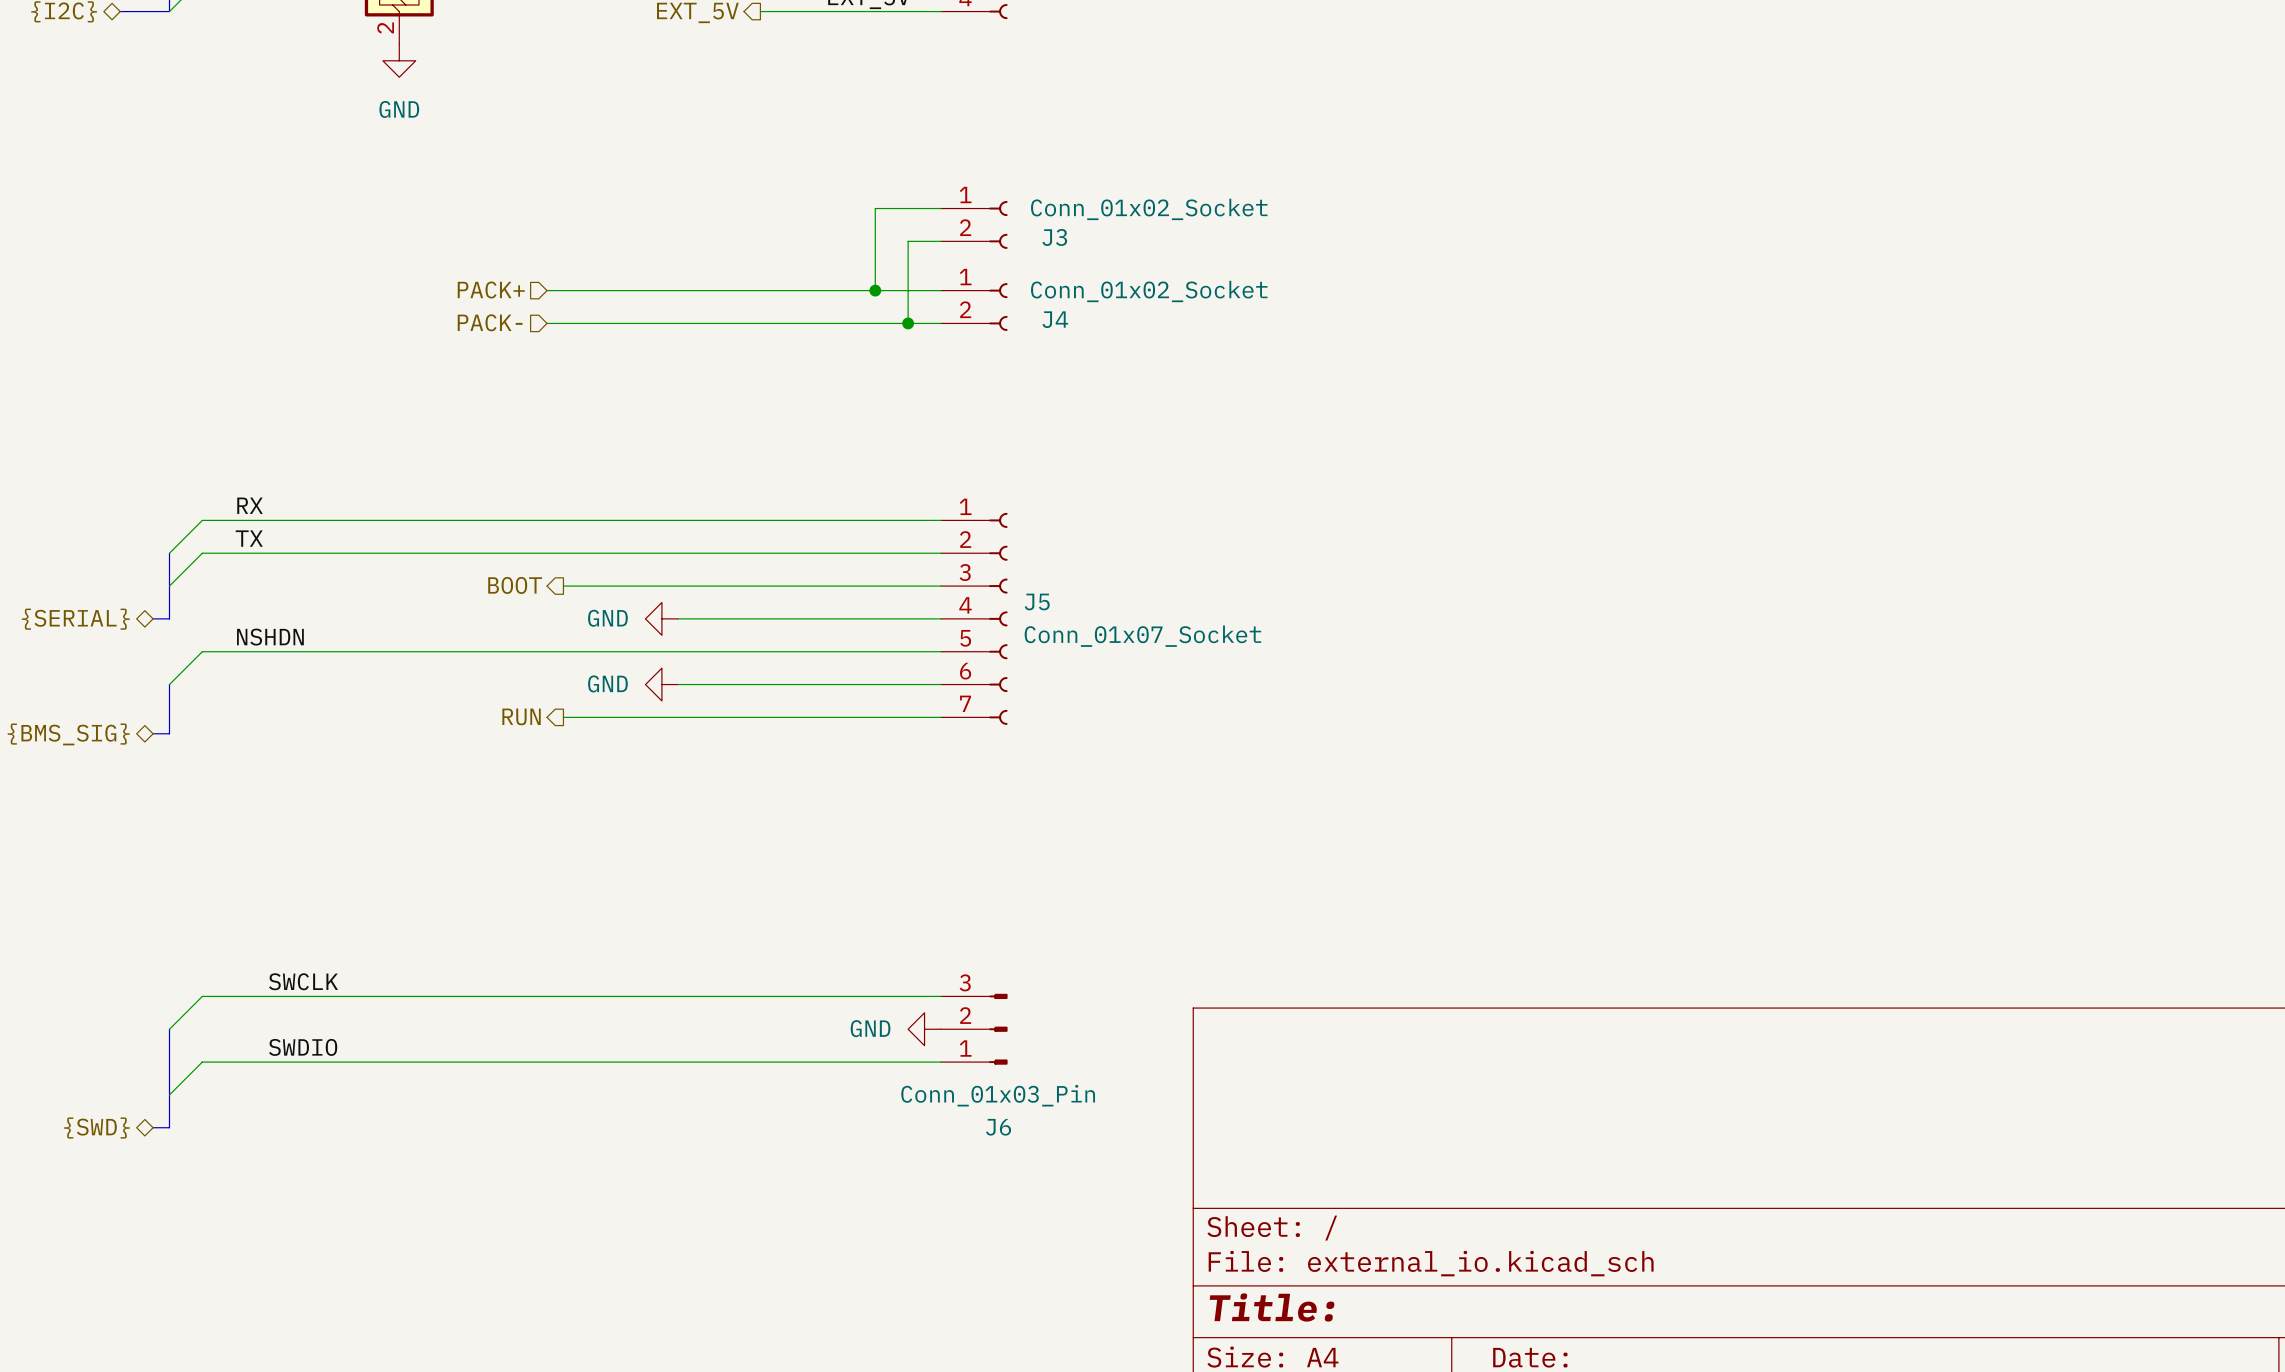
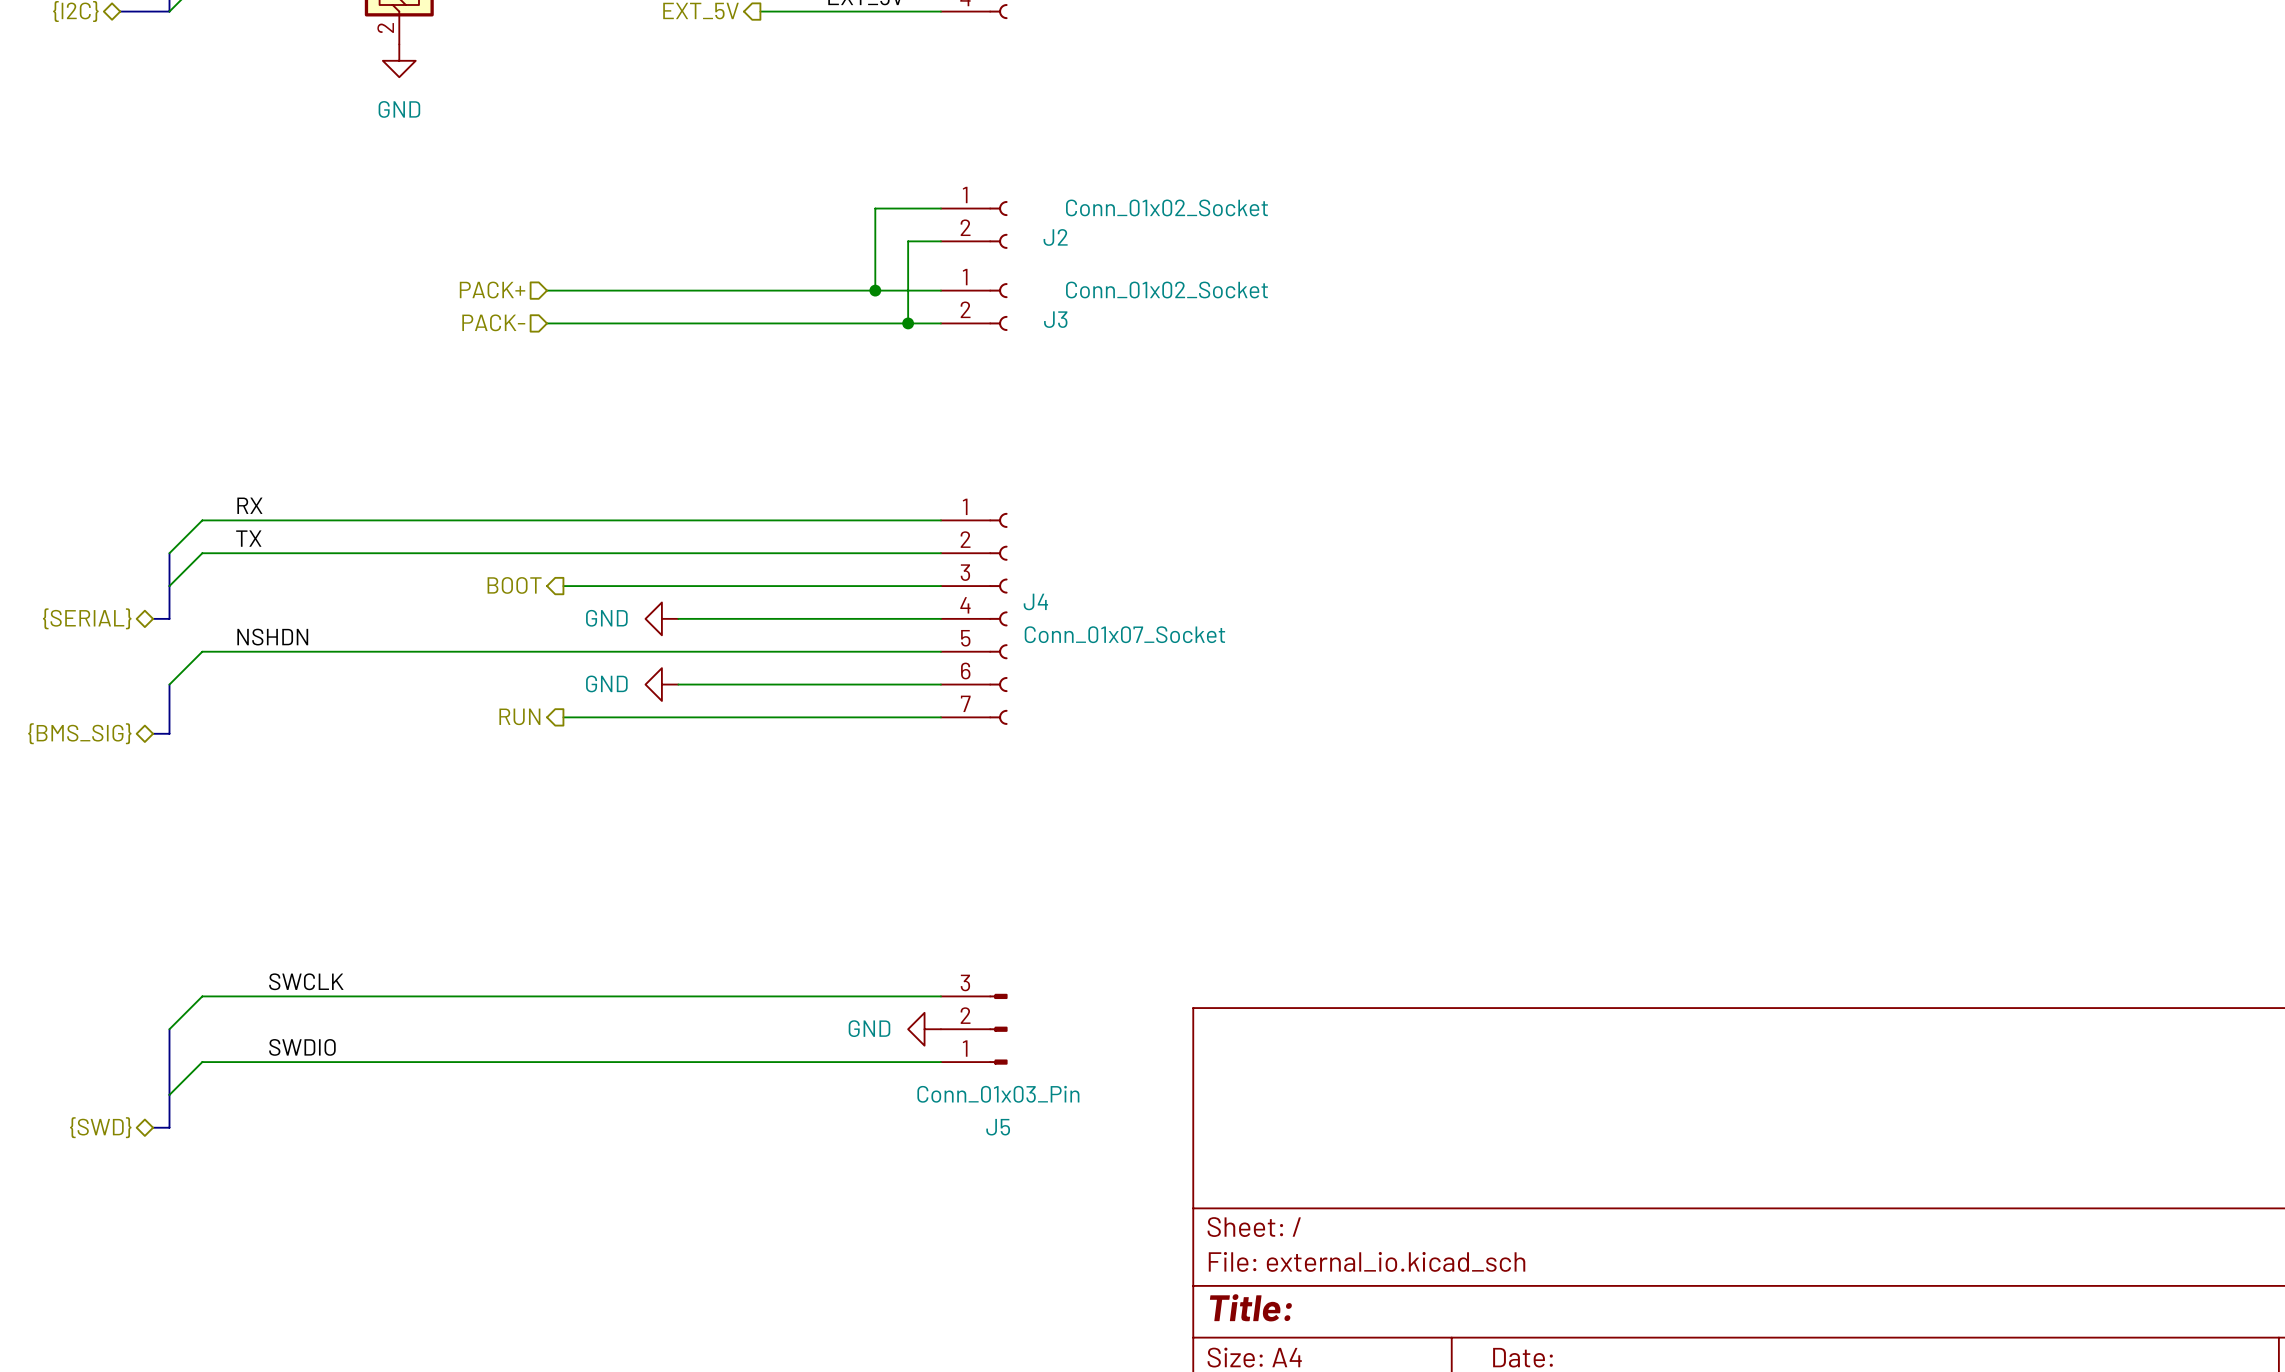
J3 name: J3 (1054, 237) -> J2 (1055, 237)
J4 name: J4 (1055, 319) -> J3 (1055, 319)
J5 name: J5 (1037, 602) -> J4 (1035, 601)
J6 name: J6 (998, 1127) -> J5 (998, 1127)

